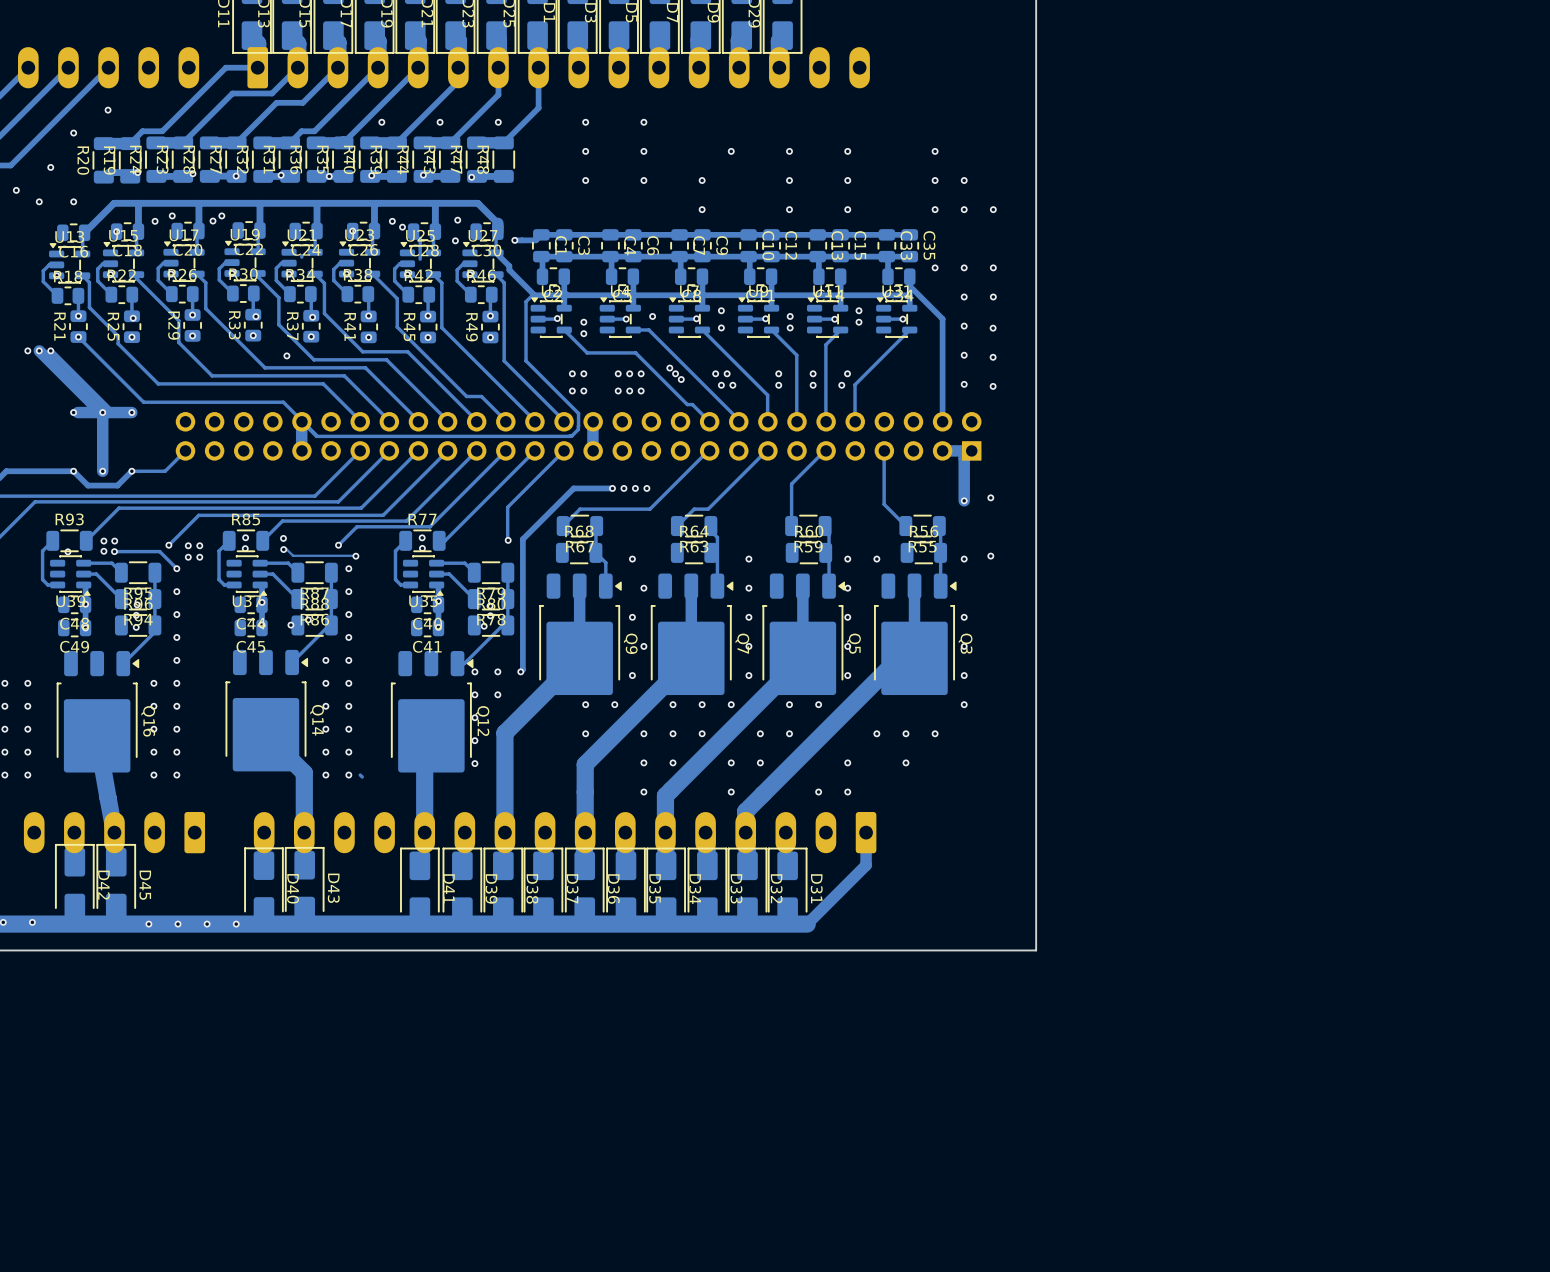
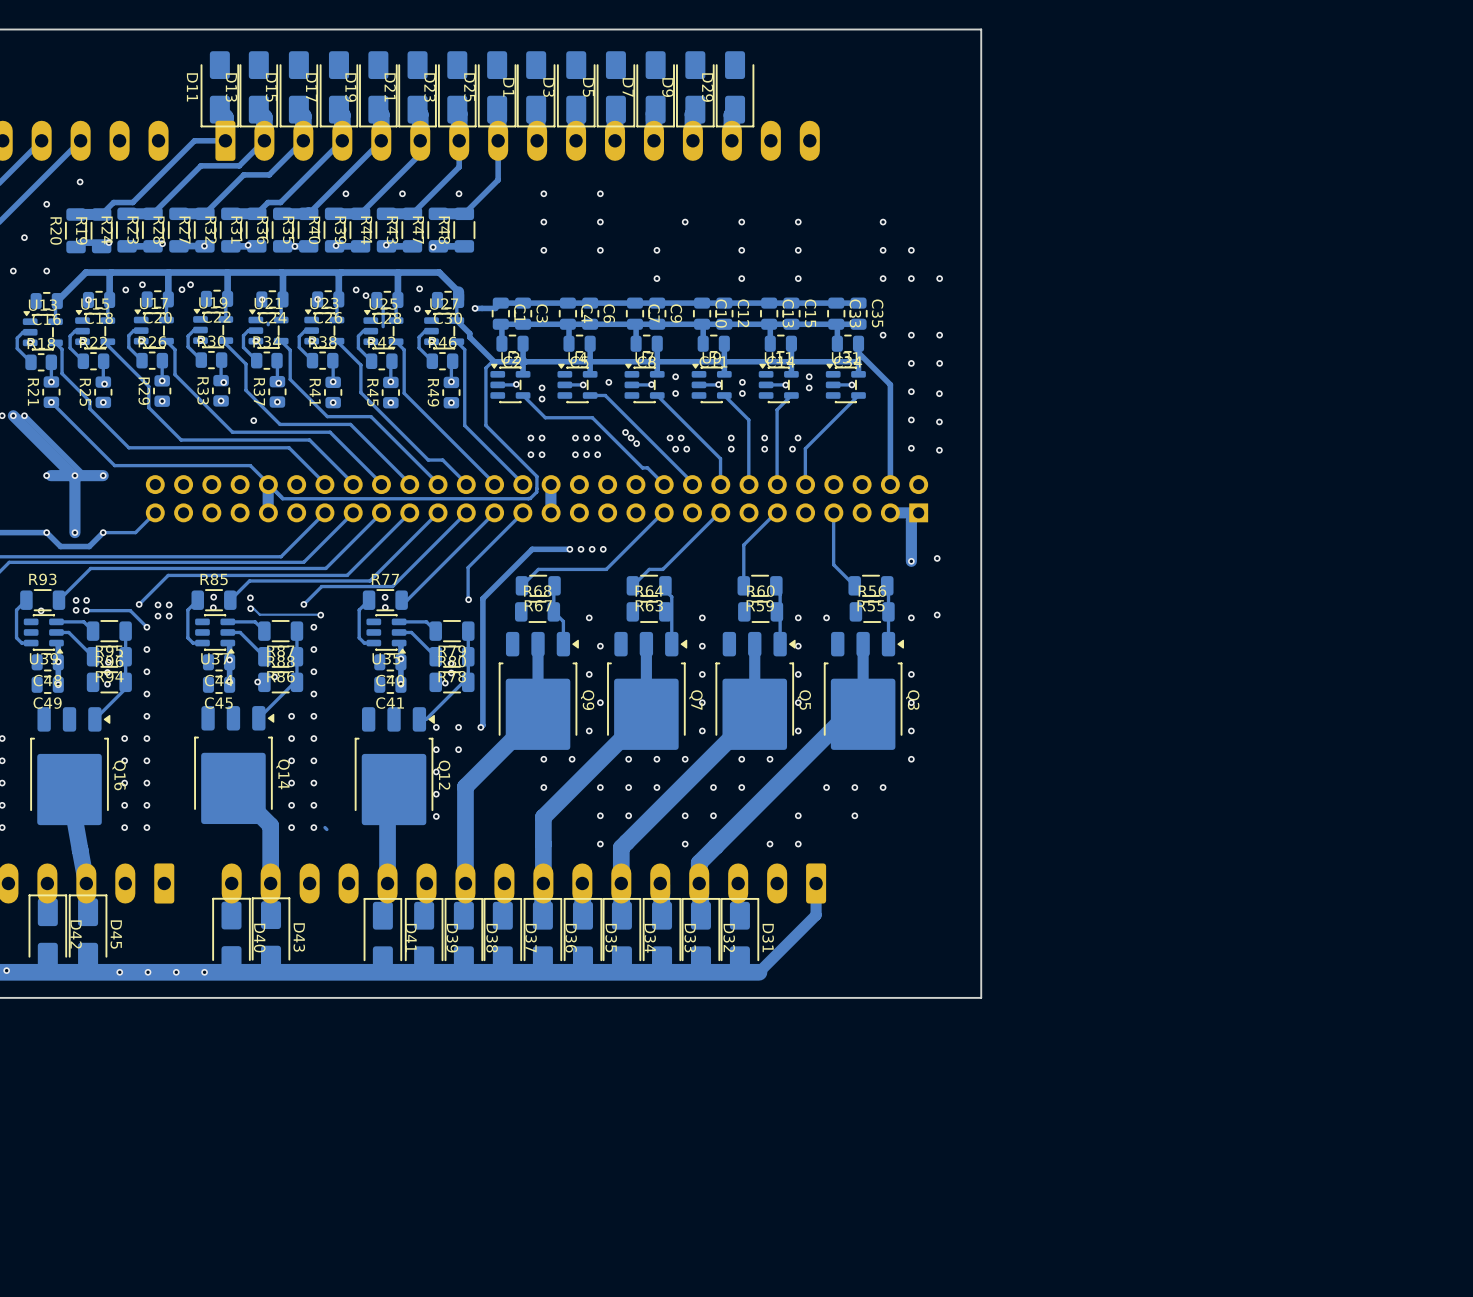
via: none -> (262, 299)

